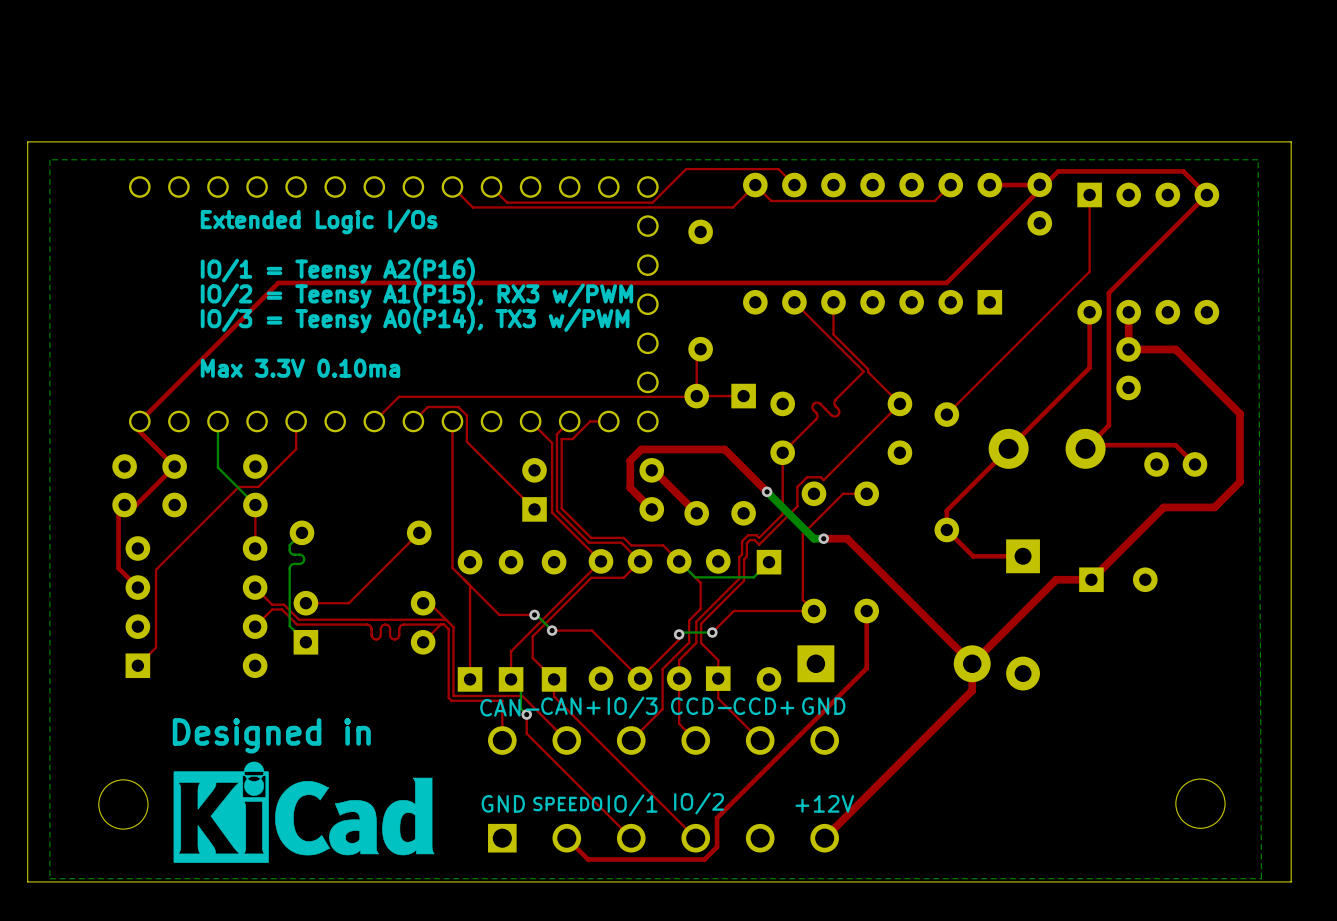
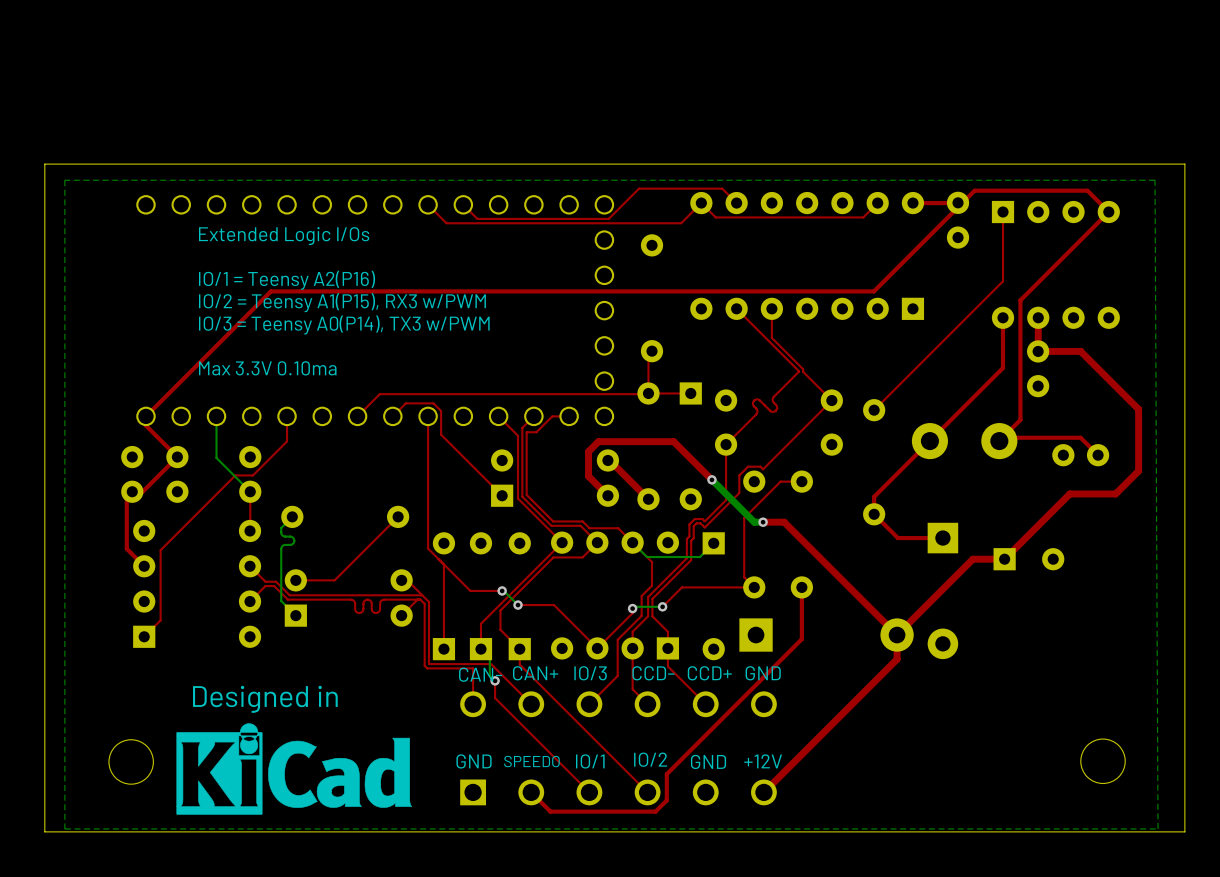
text: none -> GND (708, 761)

